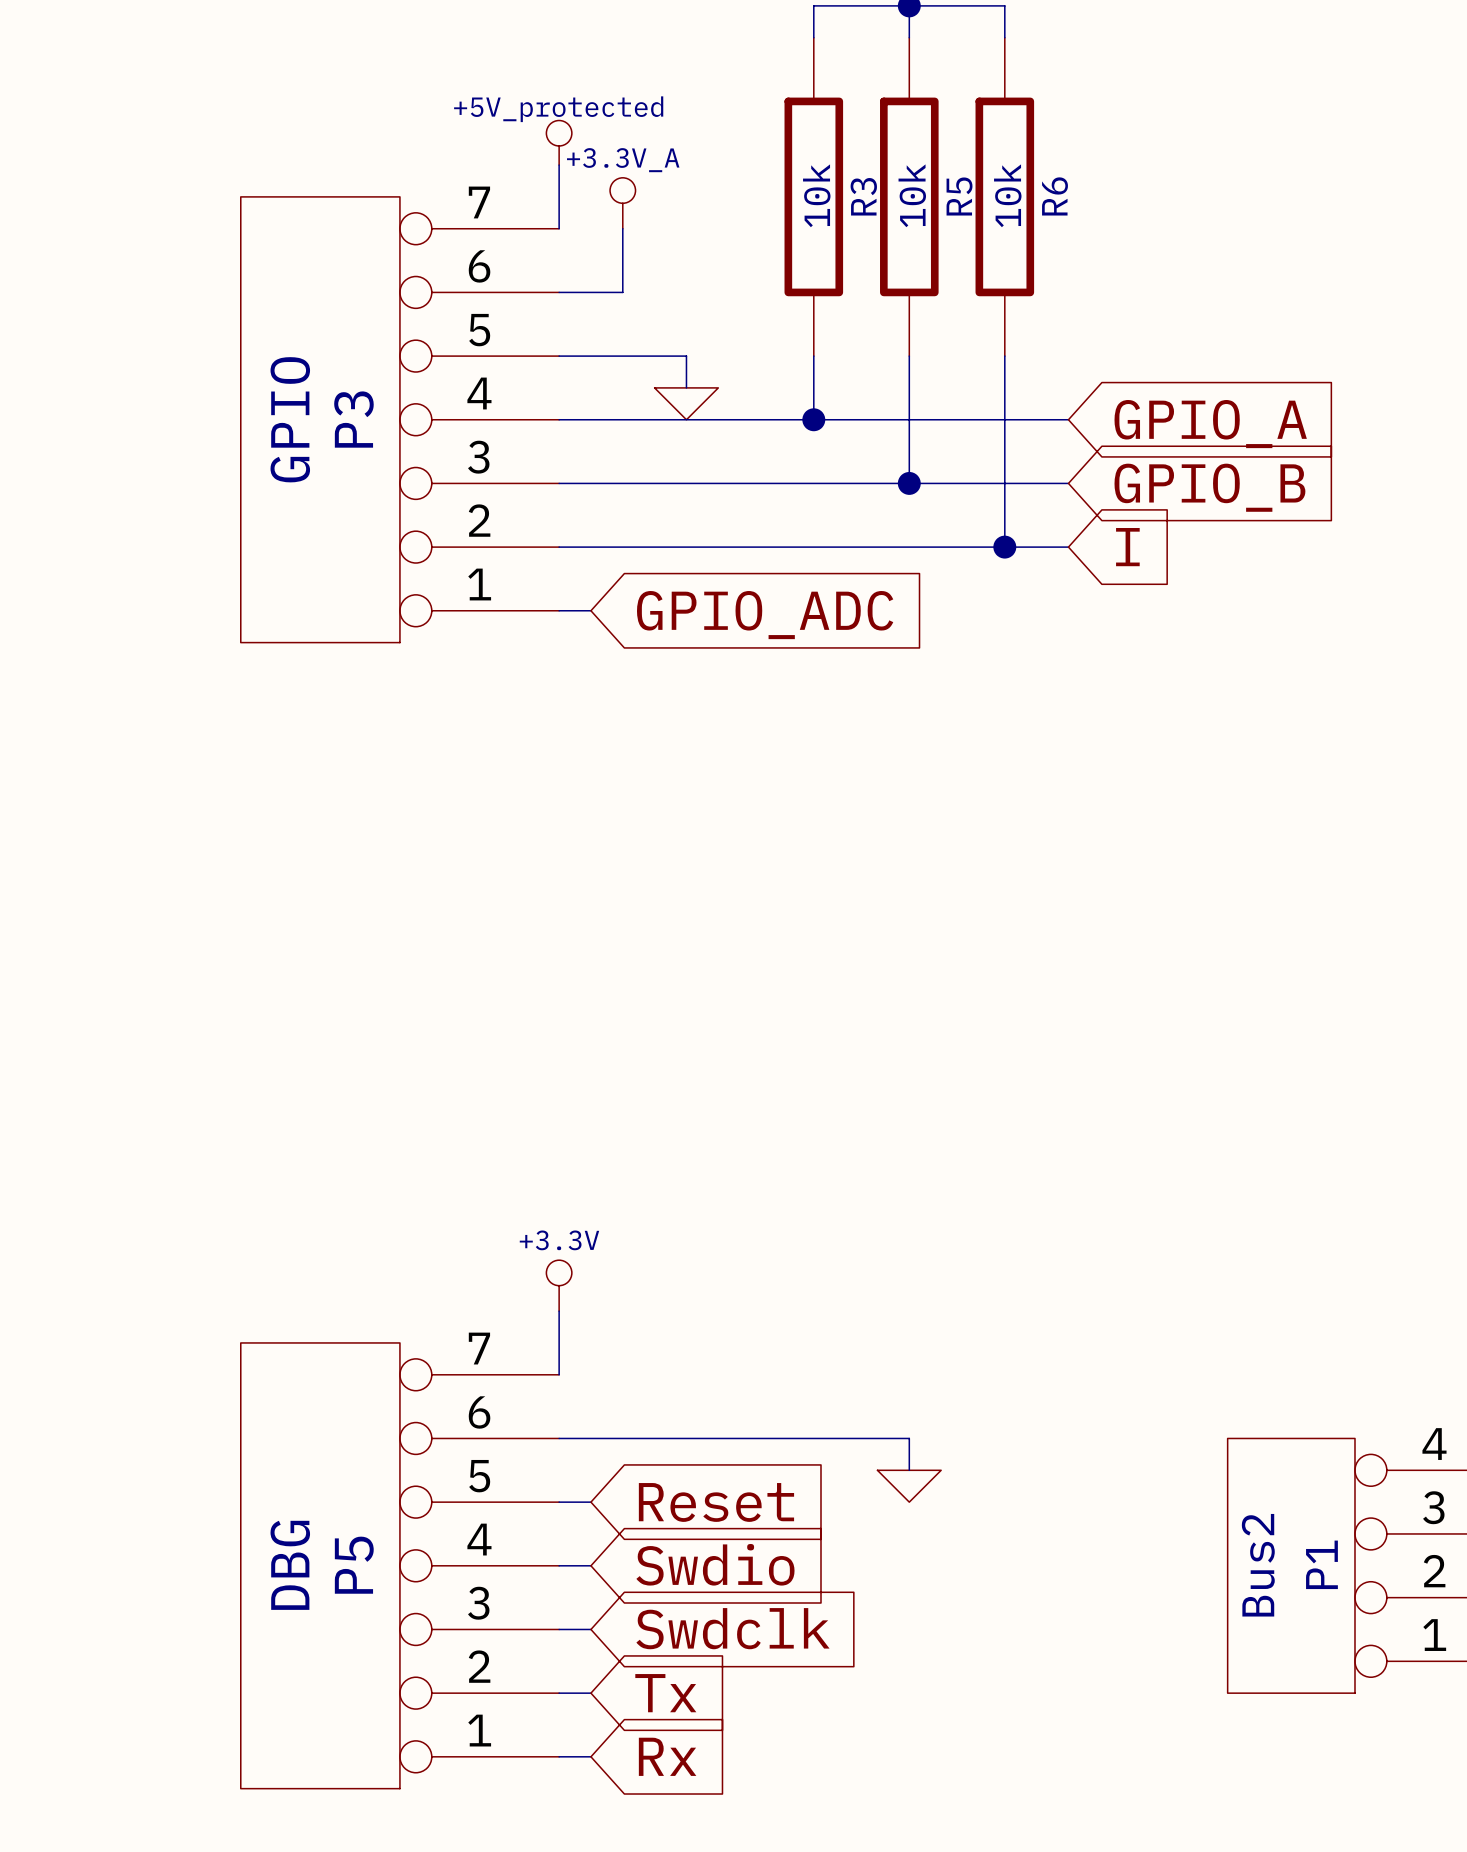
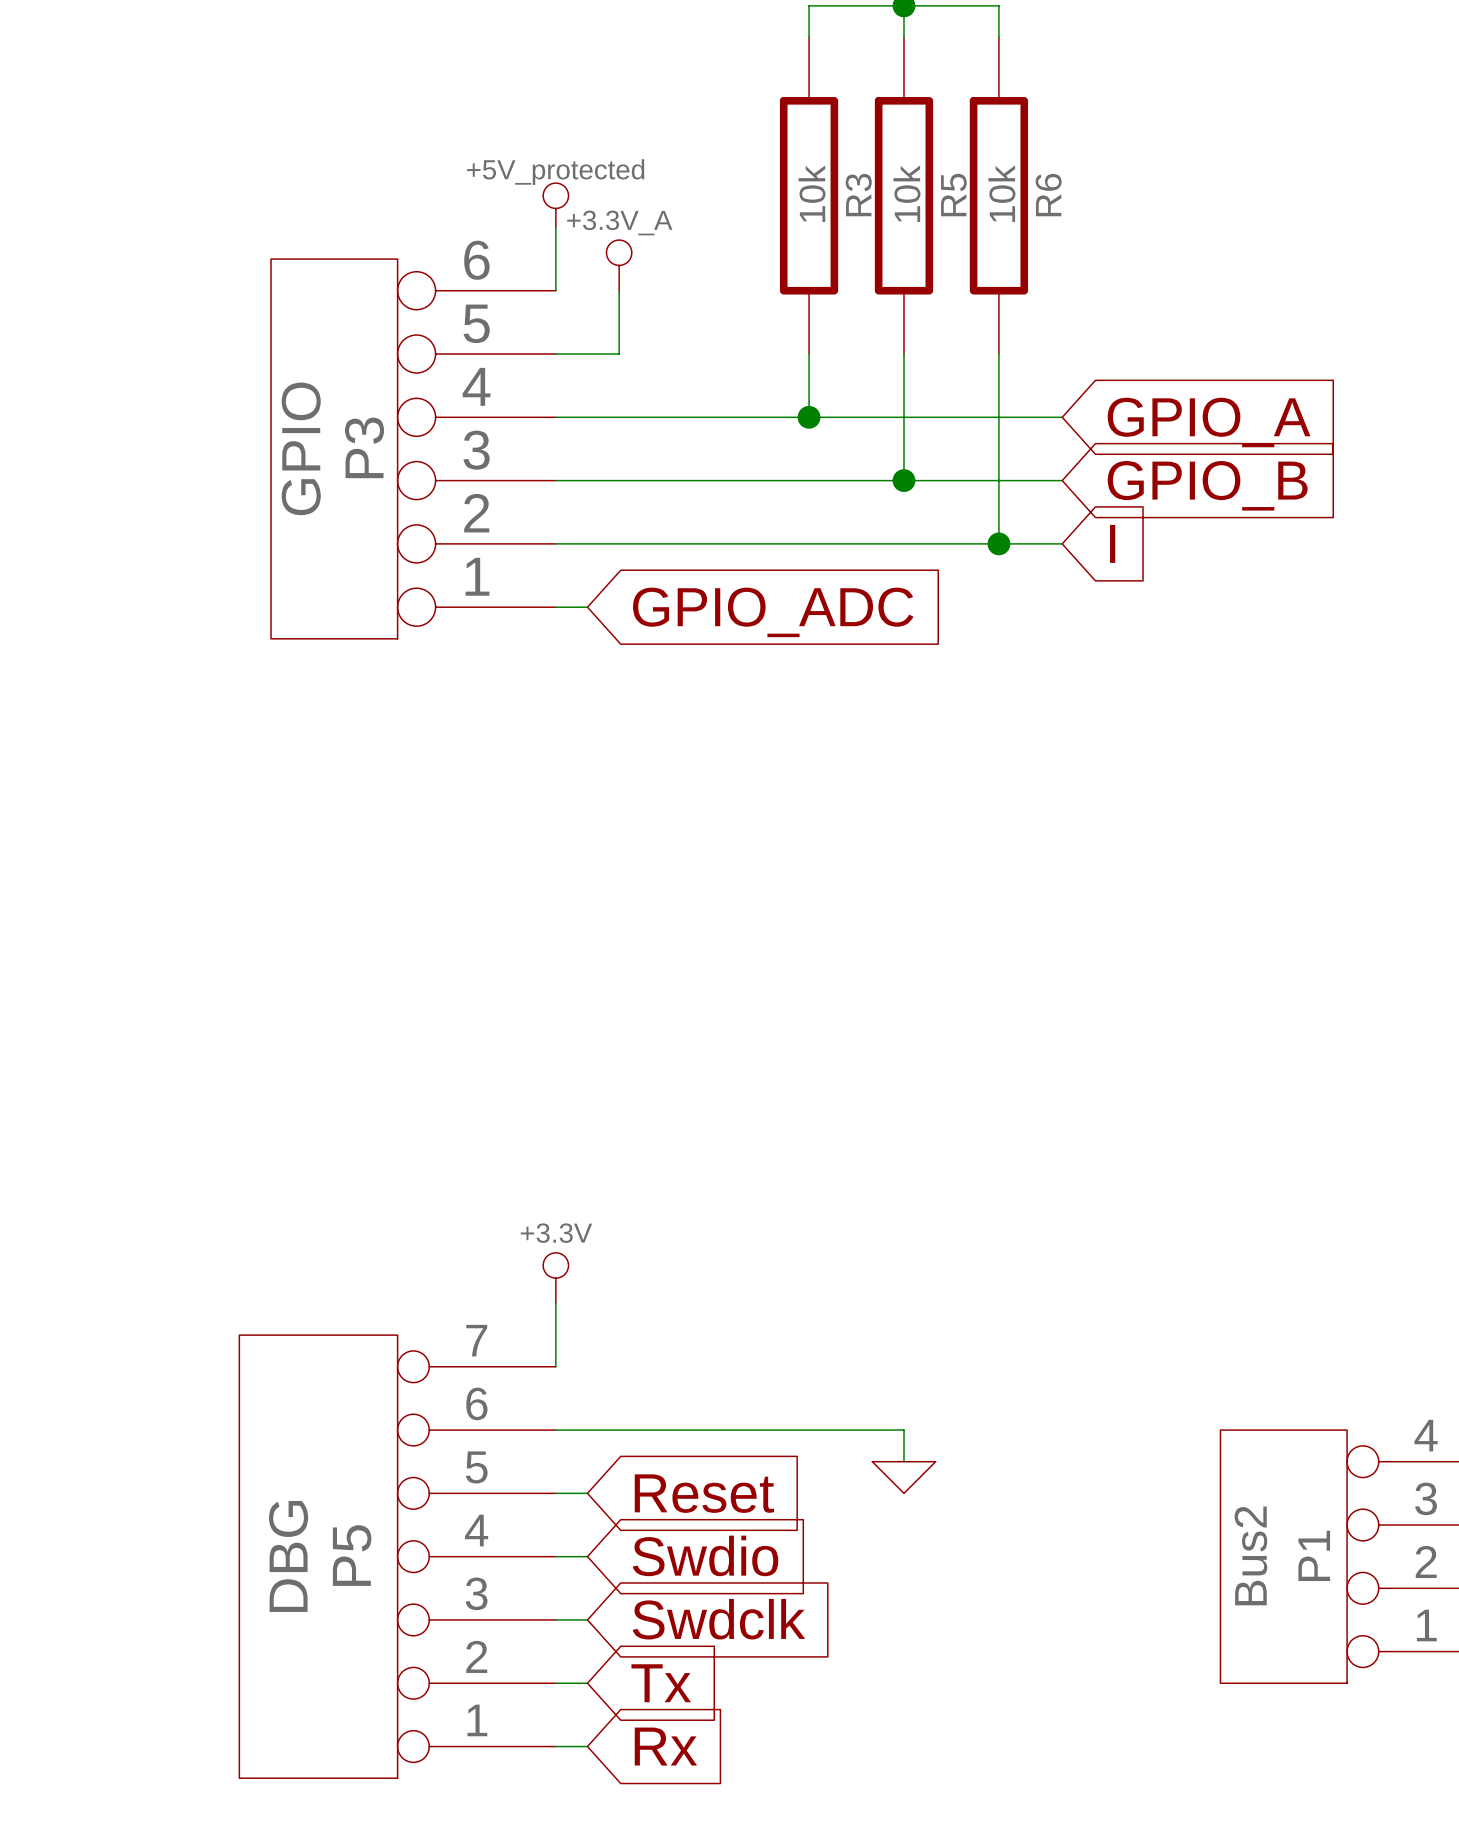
power symbol position: +5V_protected (559, 142) -> +5V_protected (555, 205)
wire: (559, 165) (559, 228) -> none
P3 symbol: [240, 196, 560, 643] -> [271, 259, 556, 639]
power symbol position: +3.3V_A (622, 203) -> +3.3V_A (619, 265)
wire: (622, 228) (622, 292) (559, 292) -> (555, 227) (555, 290)
wire: (622, 356) (686, 356) (686, 387) -> (619, 354) (619, 290)
power symbol: (686, 403) -> none

